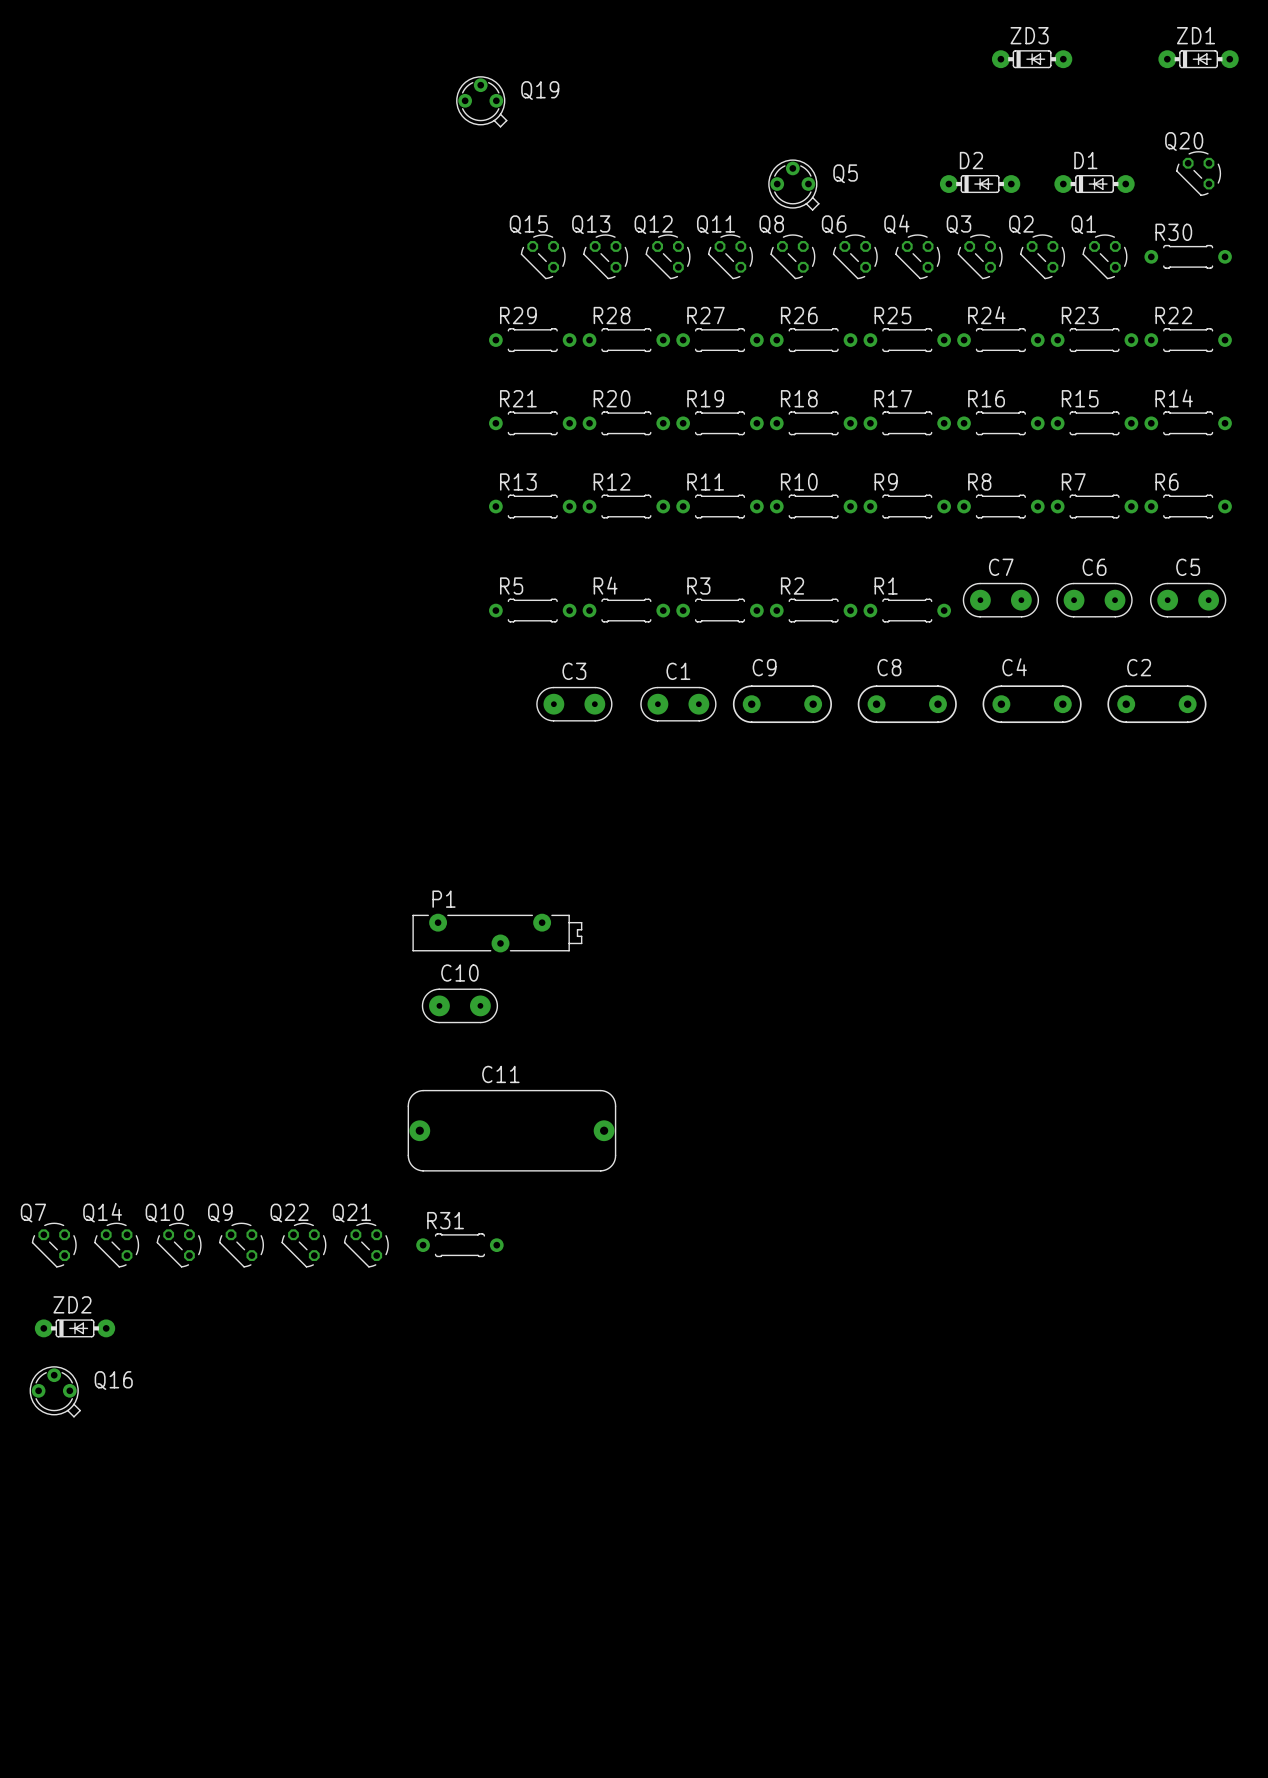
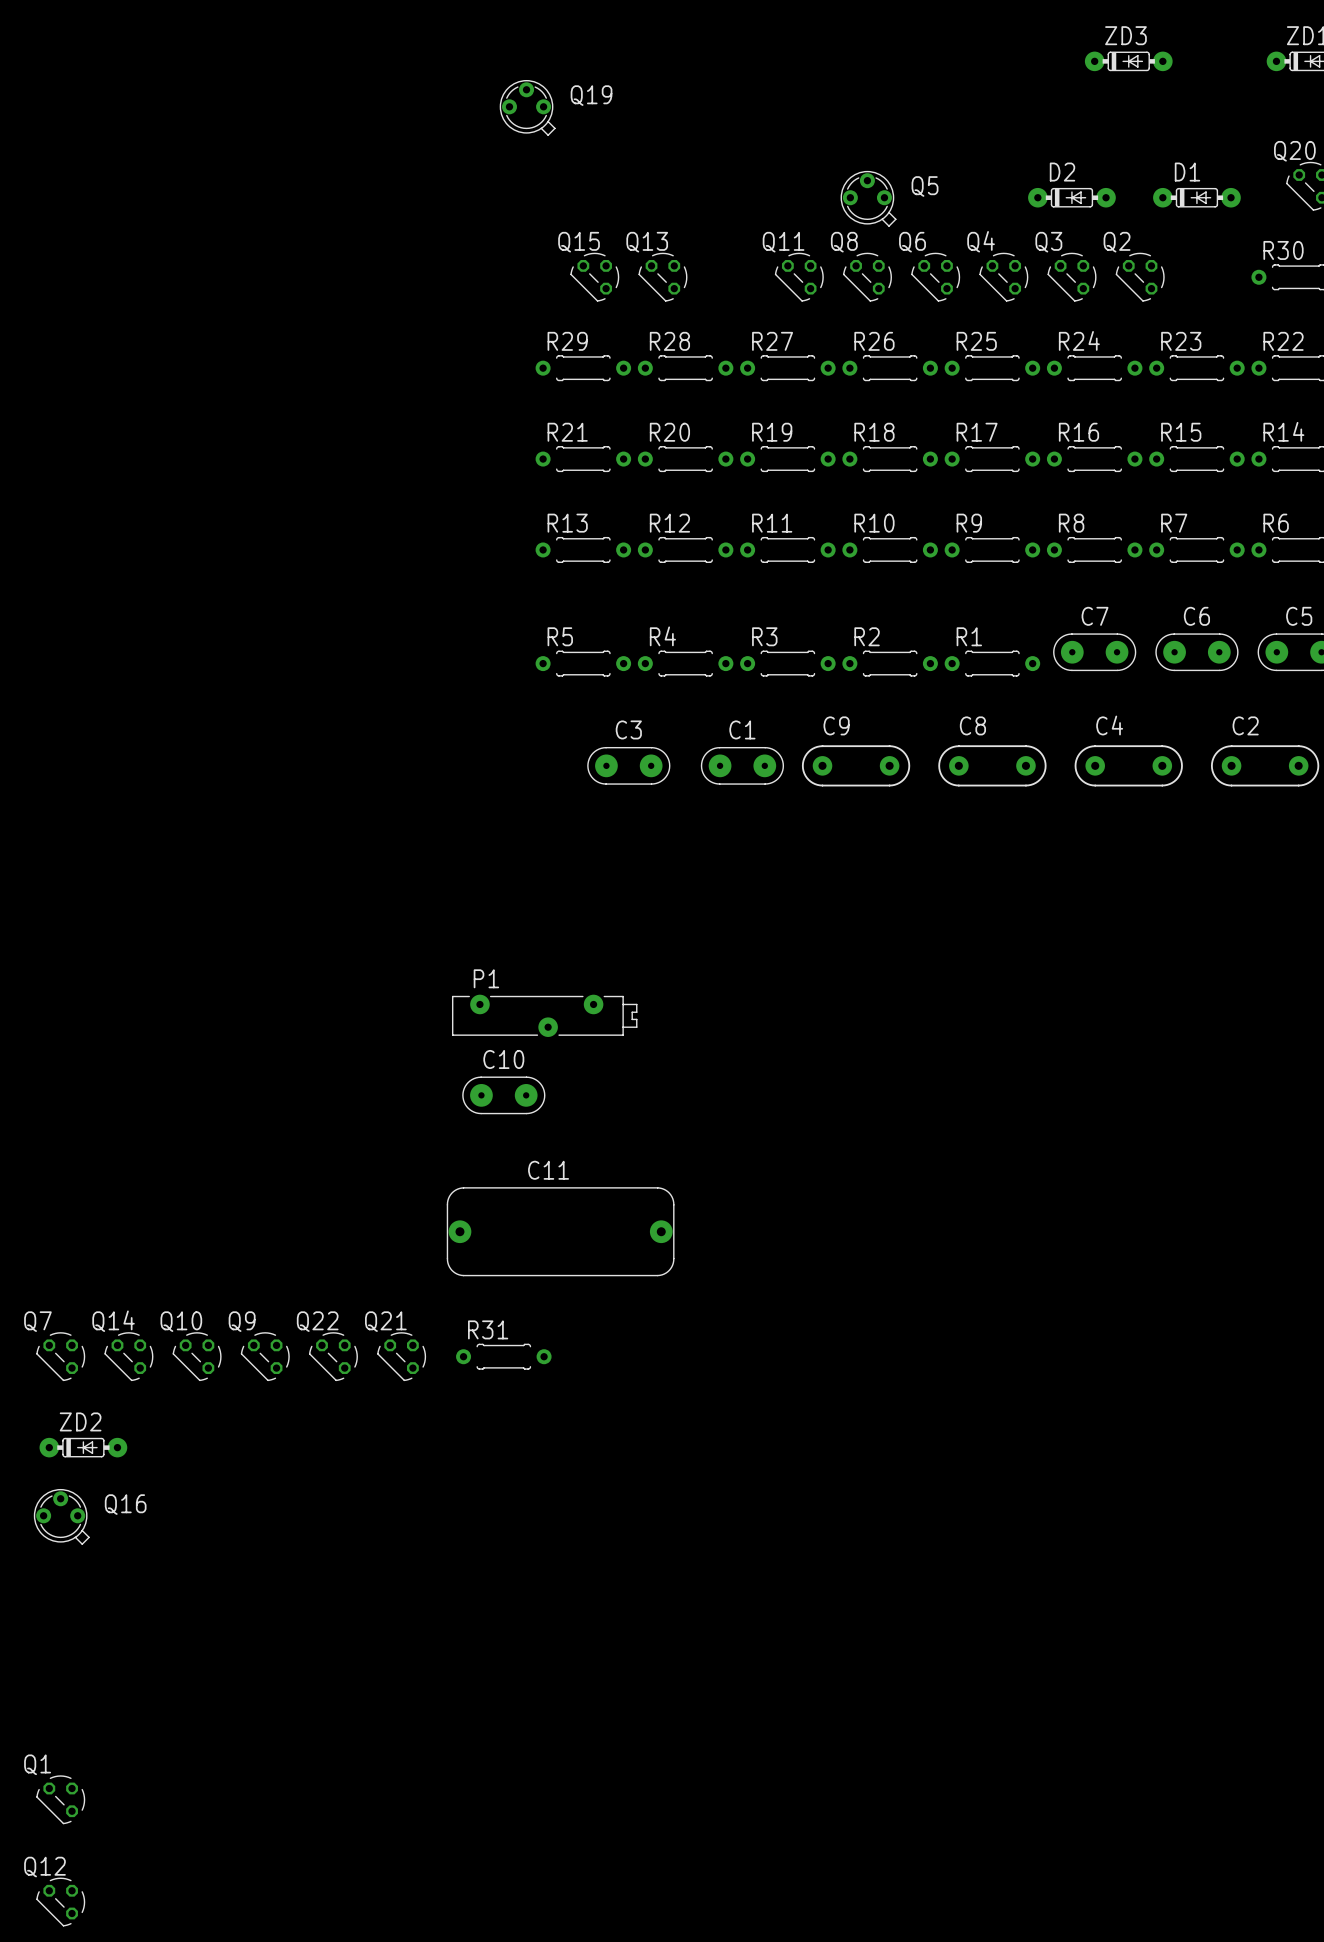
Q12 position: (668, 256) -> (60, 1902)
Q1 position: (1105, 256) -> (60, 1799)

